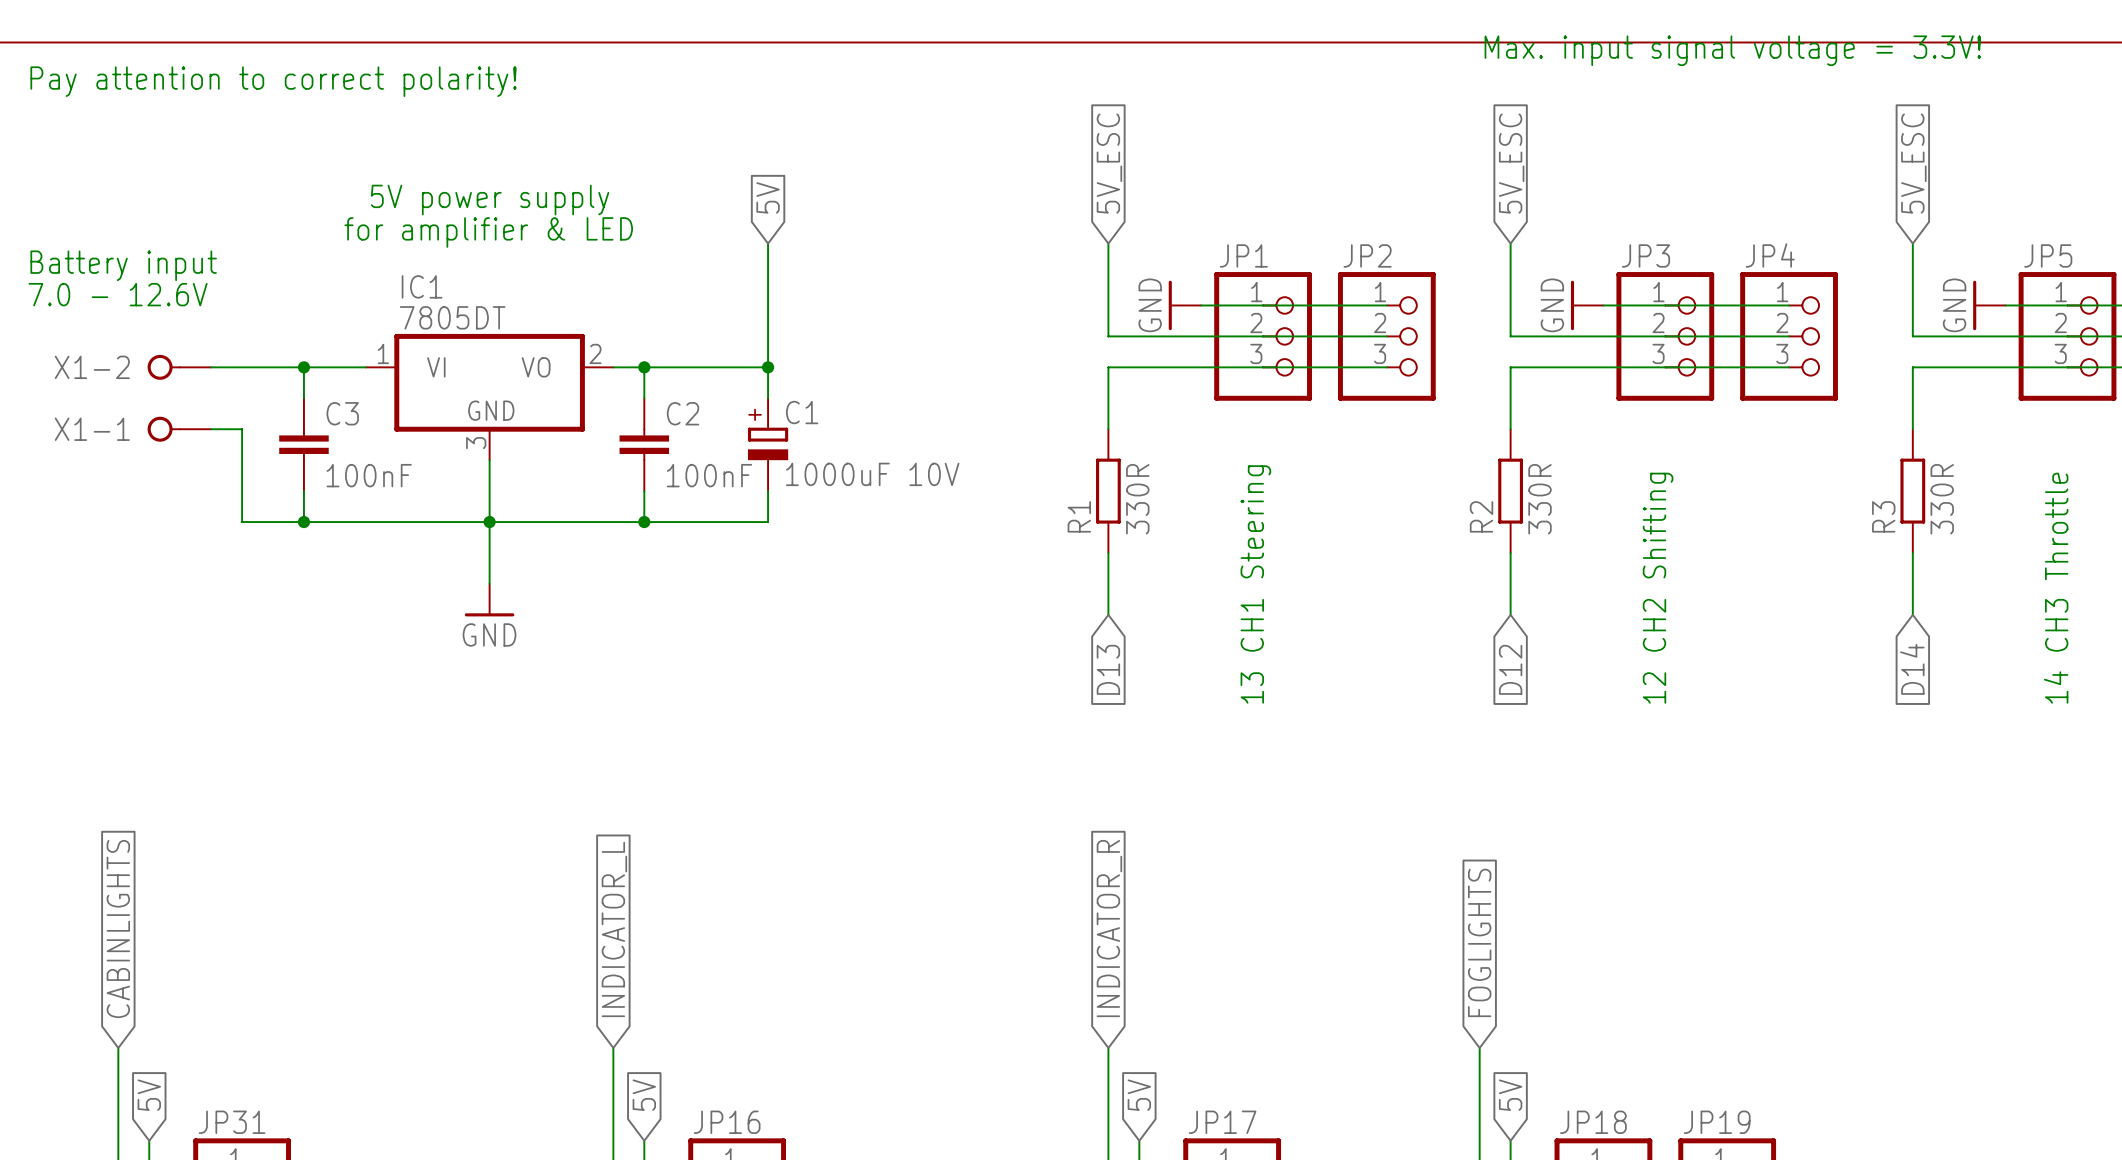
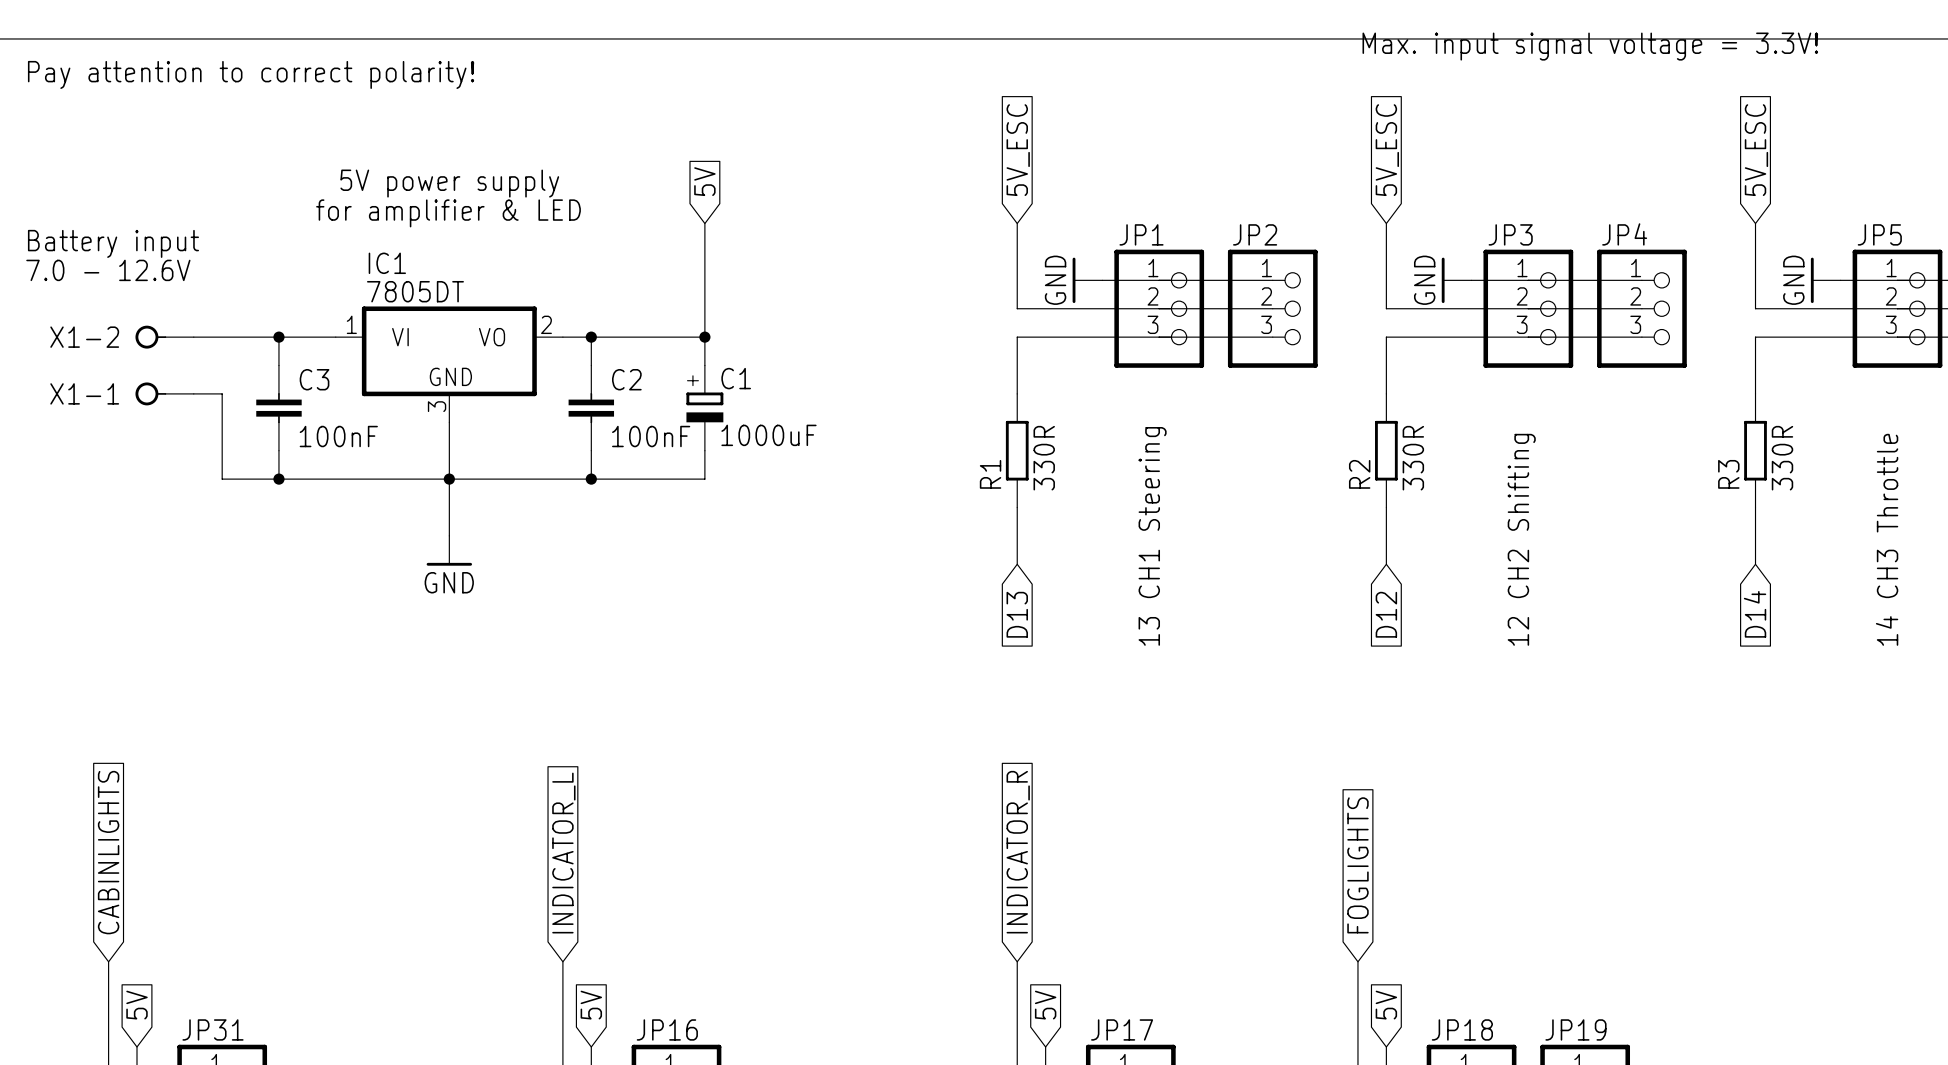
C1 value: 1000uF 10V (872, 474) -> 1000uF (768, 435)

